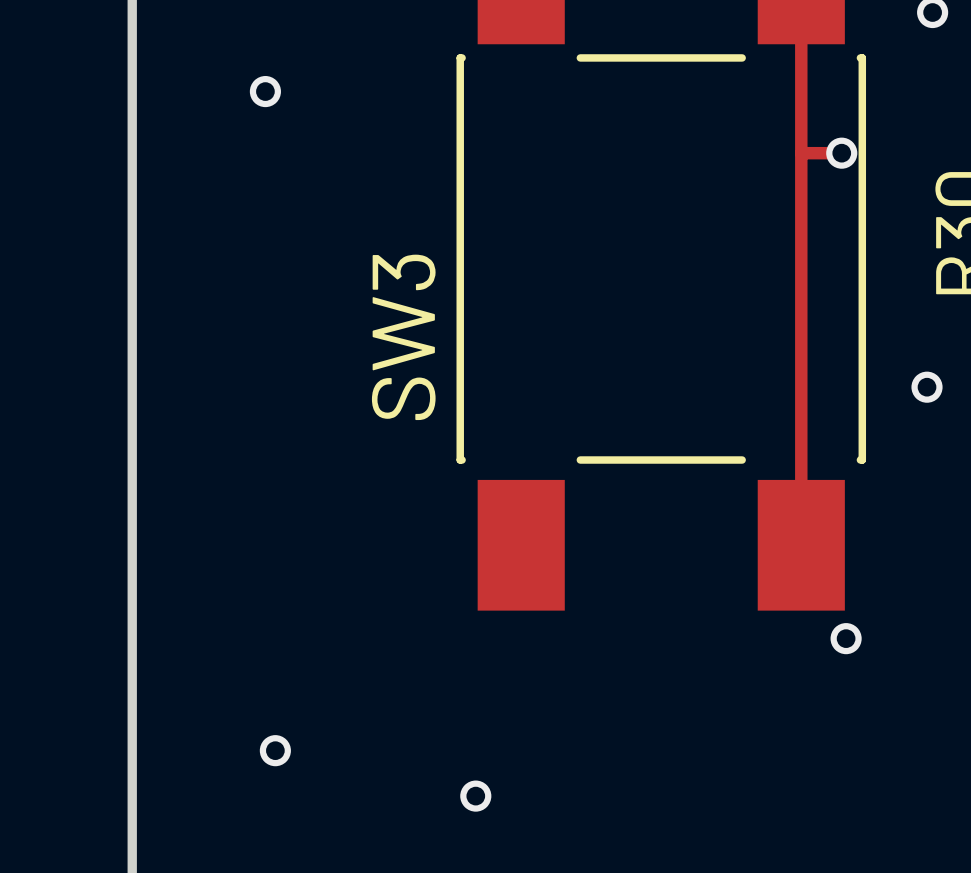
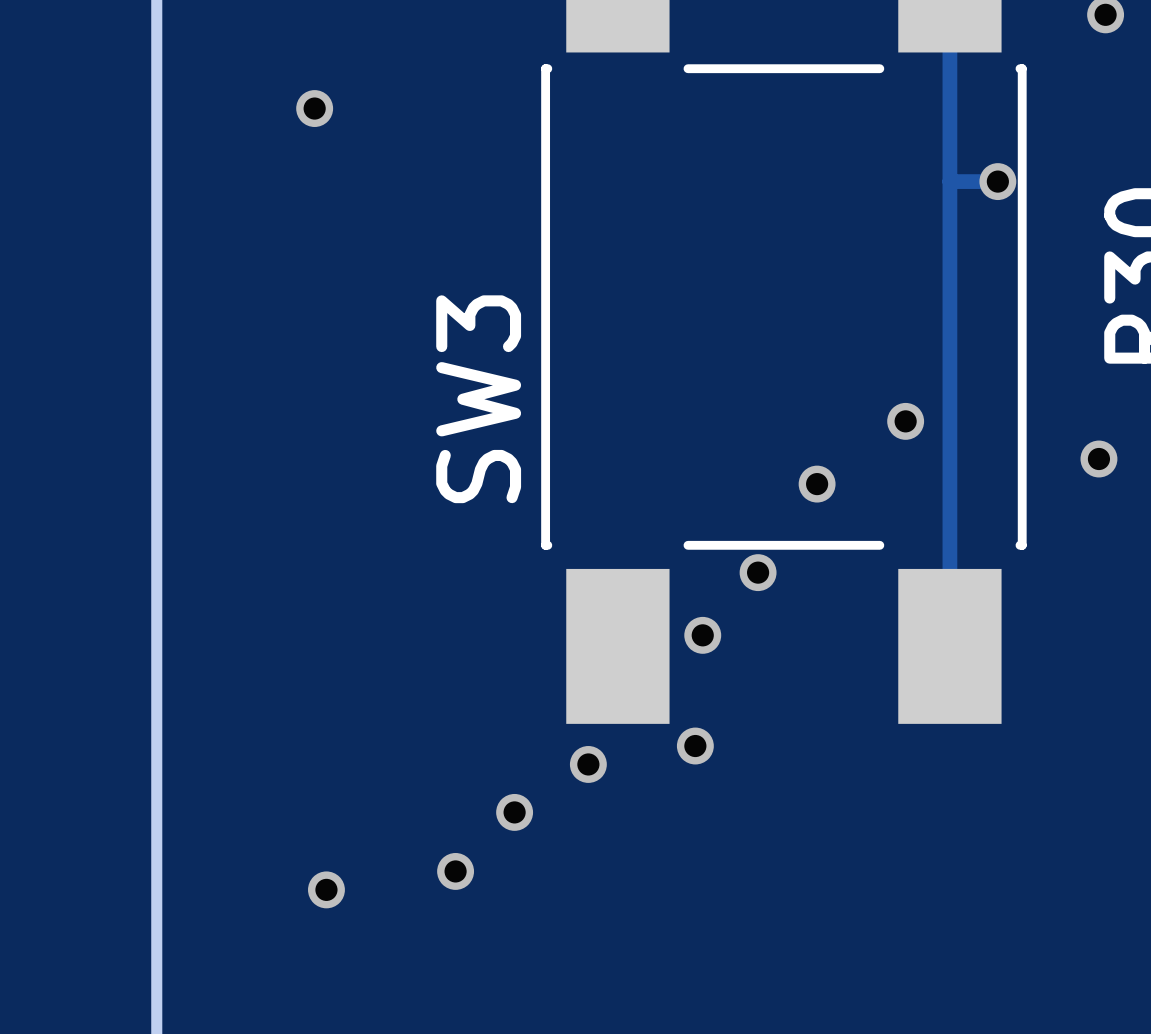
via: none -> (905, 421)
via: none -> (817, 484)
via: none -> (758, 572)
via: none -> (702, 635)
via: none -> (695, 746)
via: (846, 638) -> none
via: none -> (588, 764)
via: none -> (514, 812)
via: none -> (455, 871)
via: (475, 796) -> none

